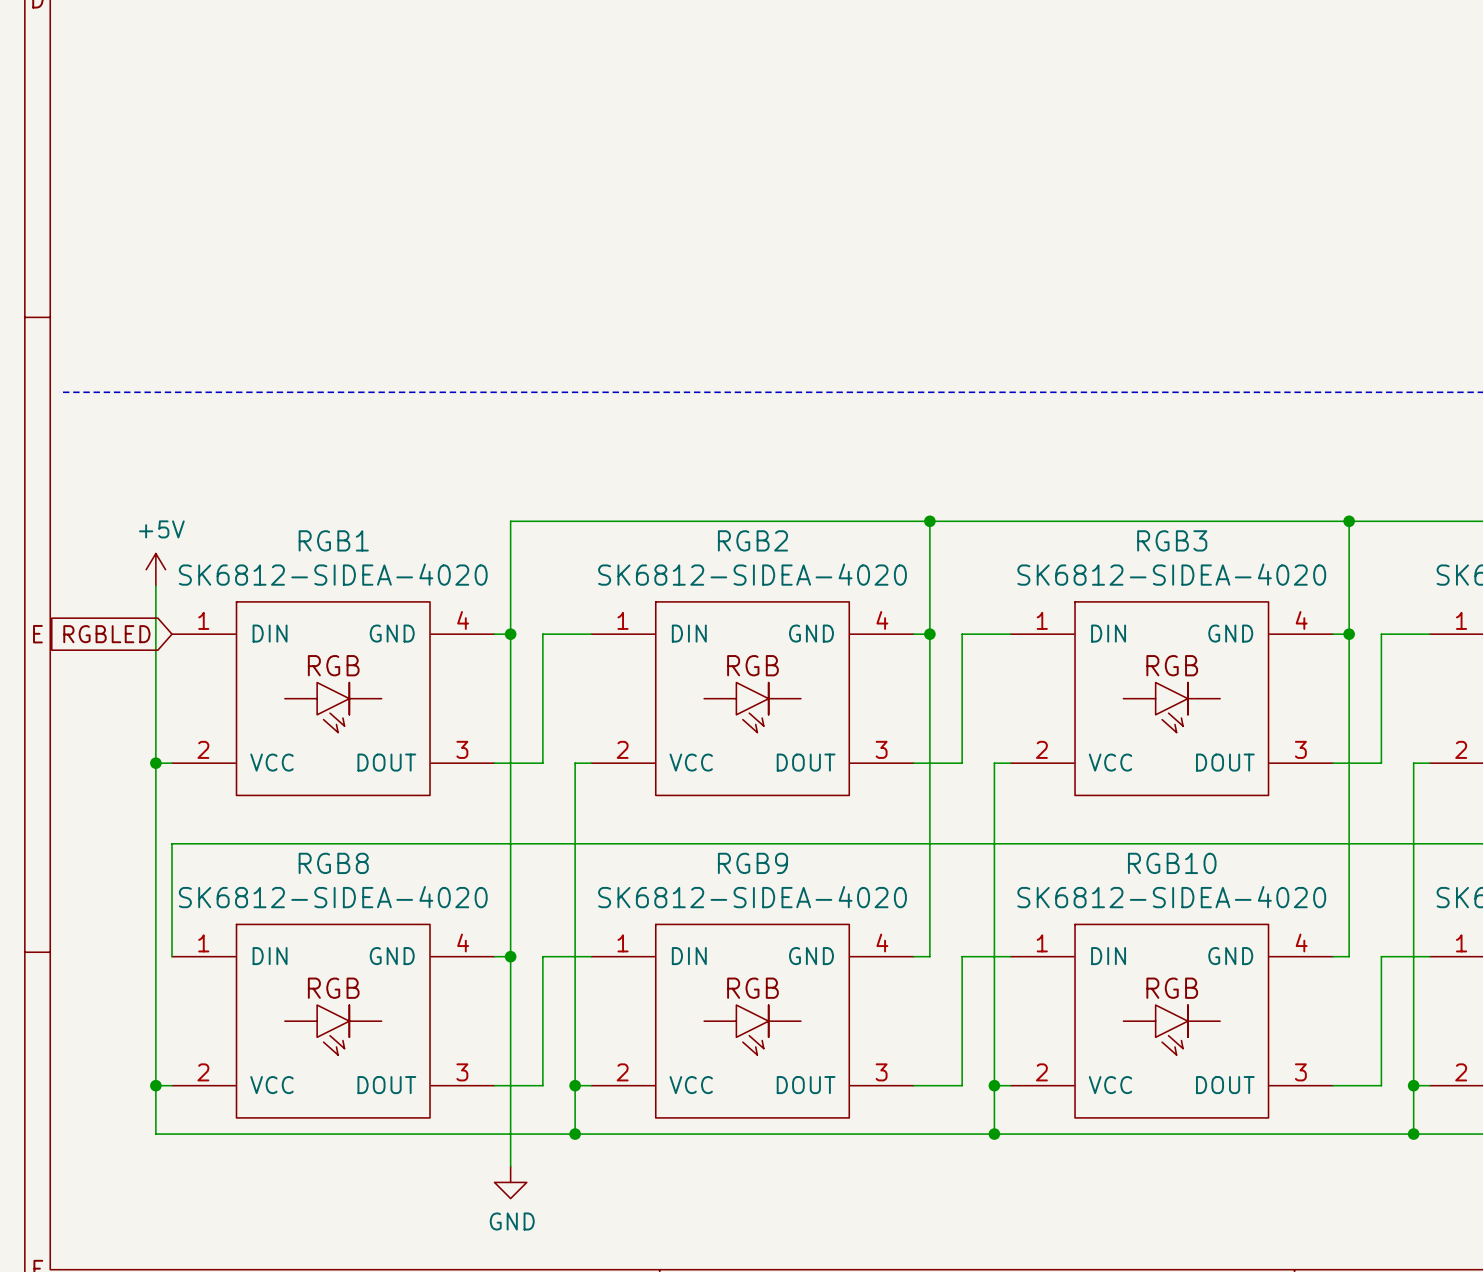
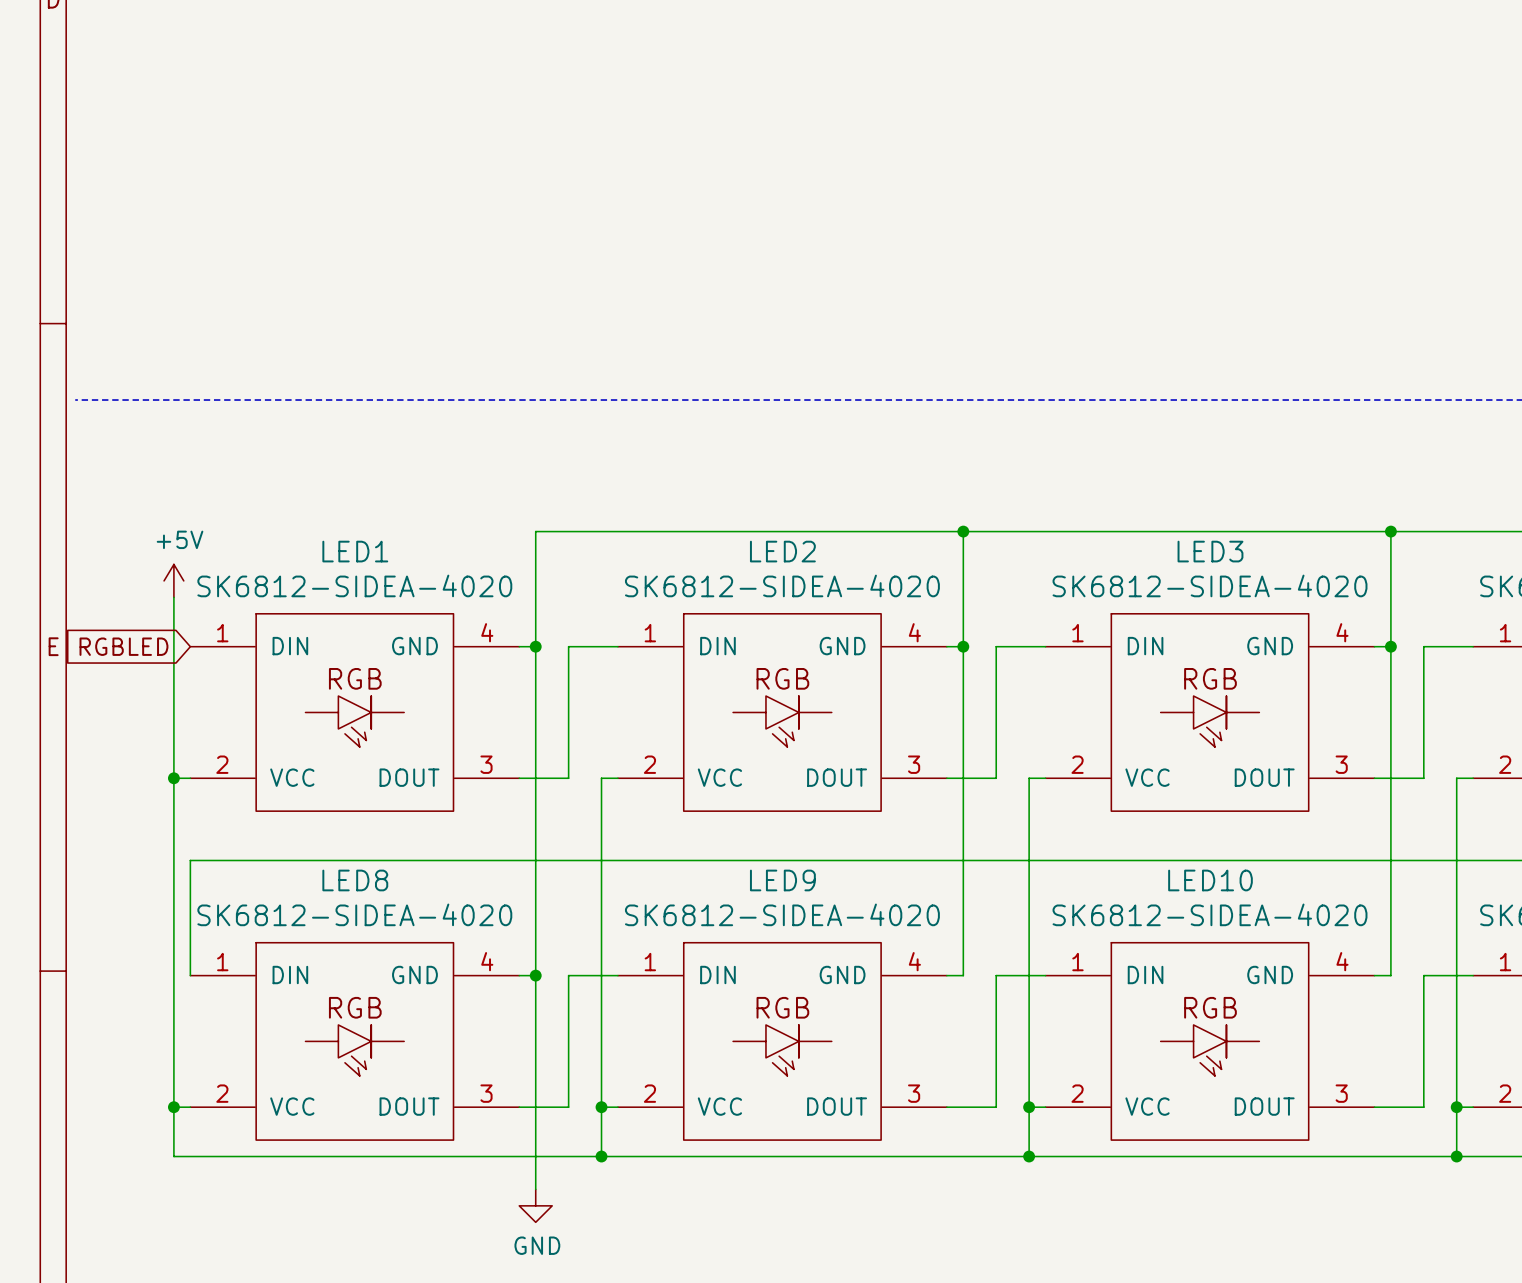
RGB1 name: RGB1 (333, 540) -> LED1 (355, 551)
RGB2 name: RGB2 (752, 540) -> LED2 (782, 551)
RGB3 name: RGB3 (1172, 540) -> LED3 (1210, 551)
RGB8 name: RGB8 (333, 863) -> LED8 (355, 880)
RGB9 name: RGB9 (752, 863) -> LED9 (782, 880)
RGB10 name: RGB10 (1172, 863) -> LED10 (1210, 880)

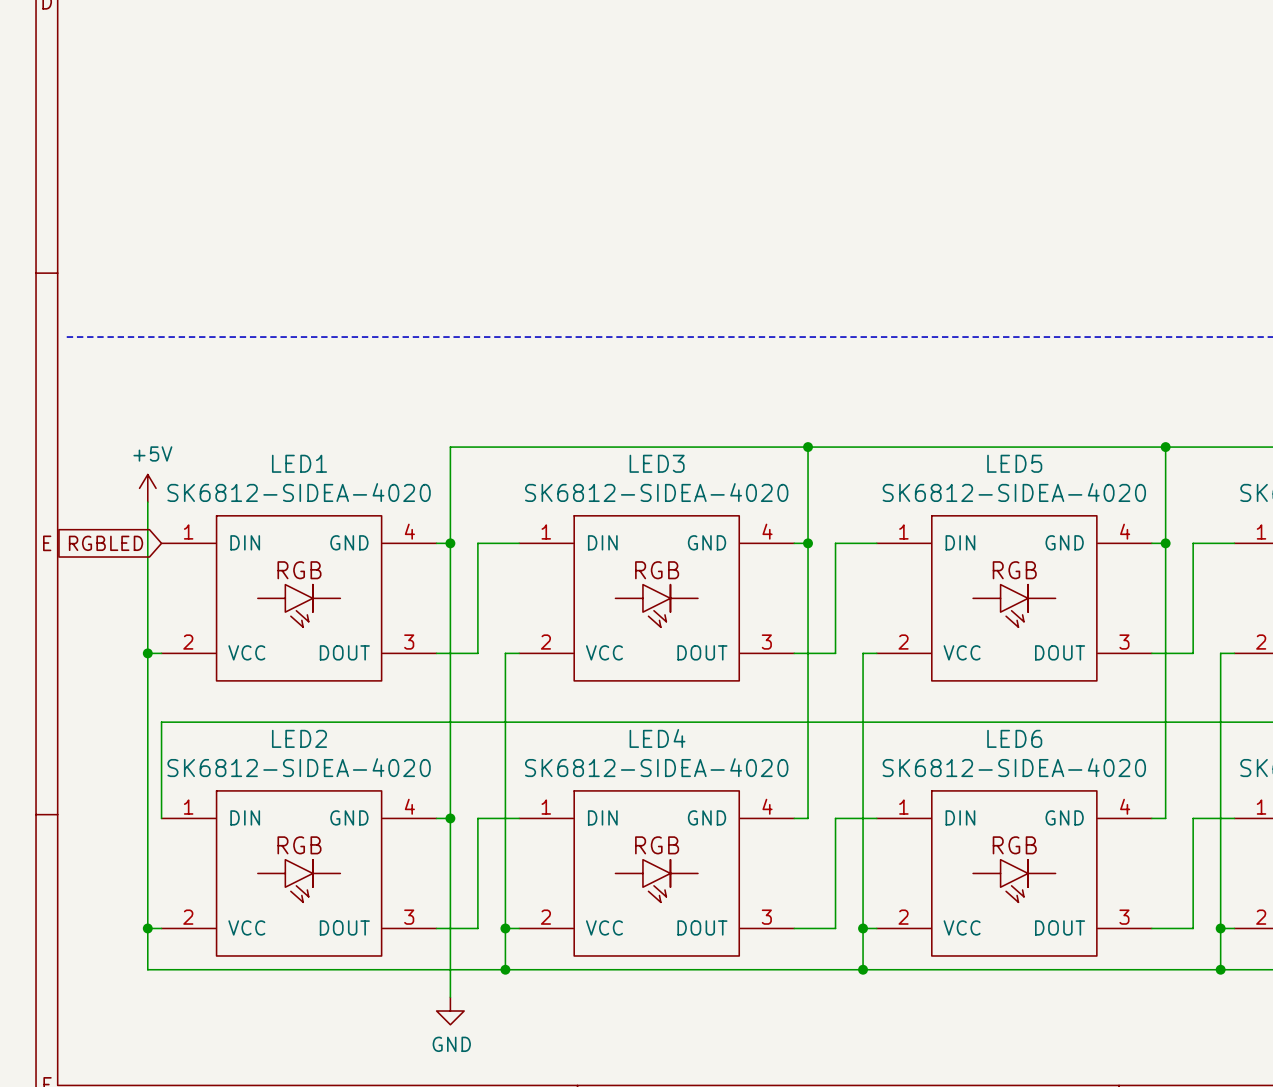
LED2 name: LED2 (782, 551) -> LED3 (657, 463)
LED3 name: LED3 (1210, 551) -> LED5 (1014, 463)
LED8 name: LED8 (355, 880) -> LED2 (299, 738)
LED9 name: LED9 (782, 880) -> LED4 (657, 738)
LED10 name: LED10 (1210, 880) -> LED6 (1014, 738)

